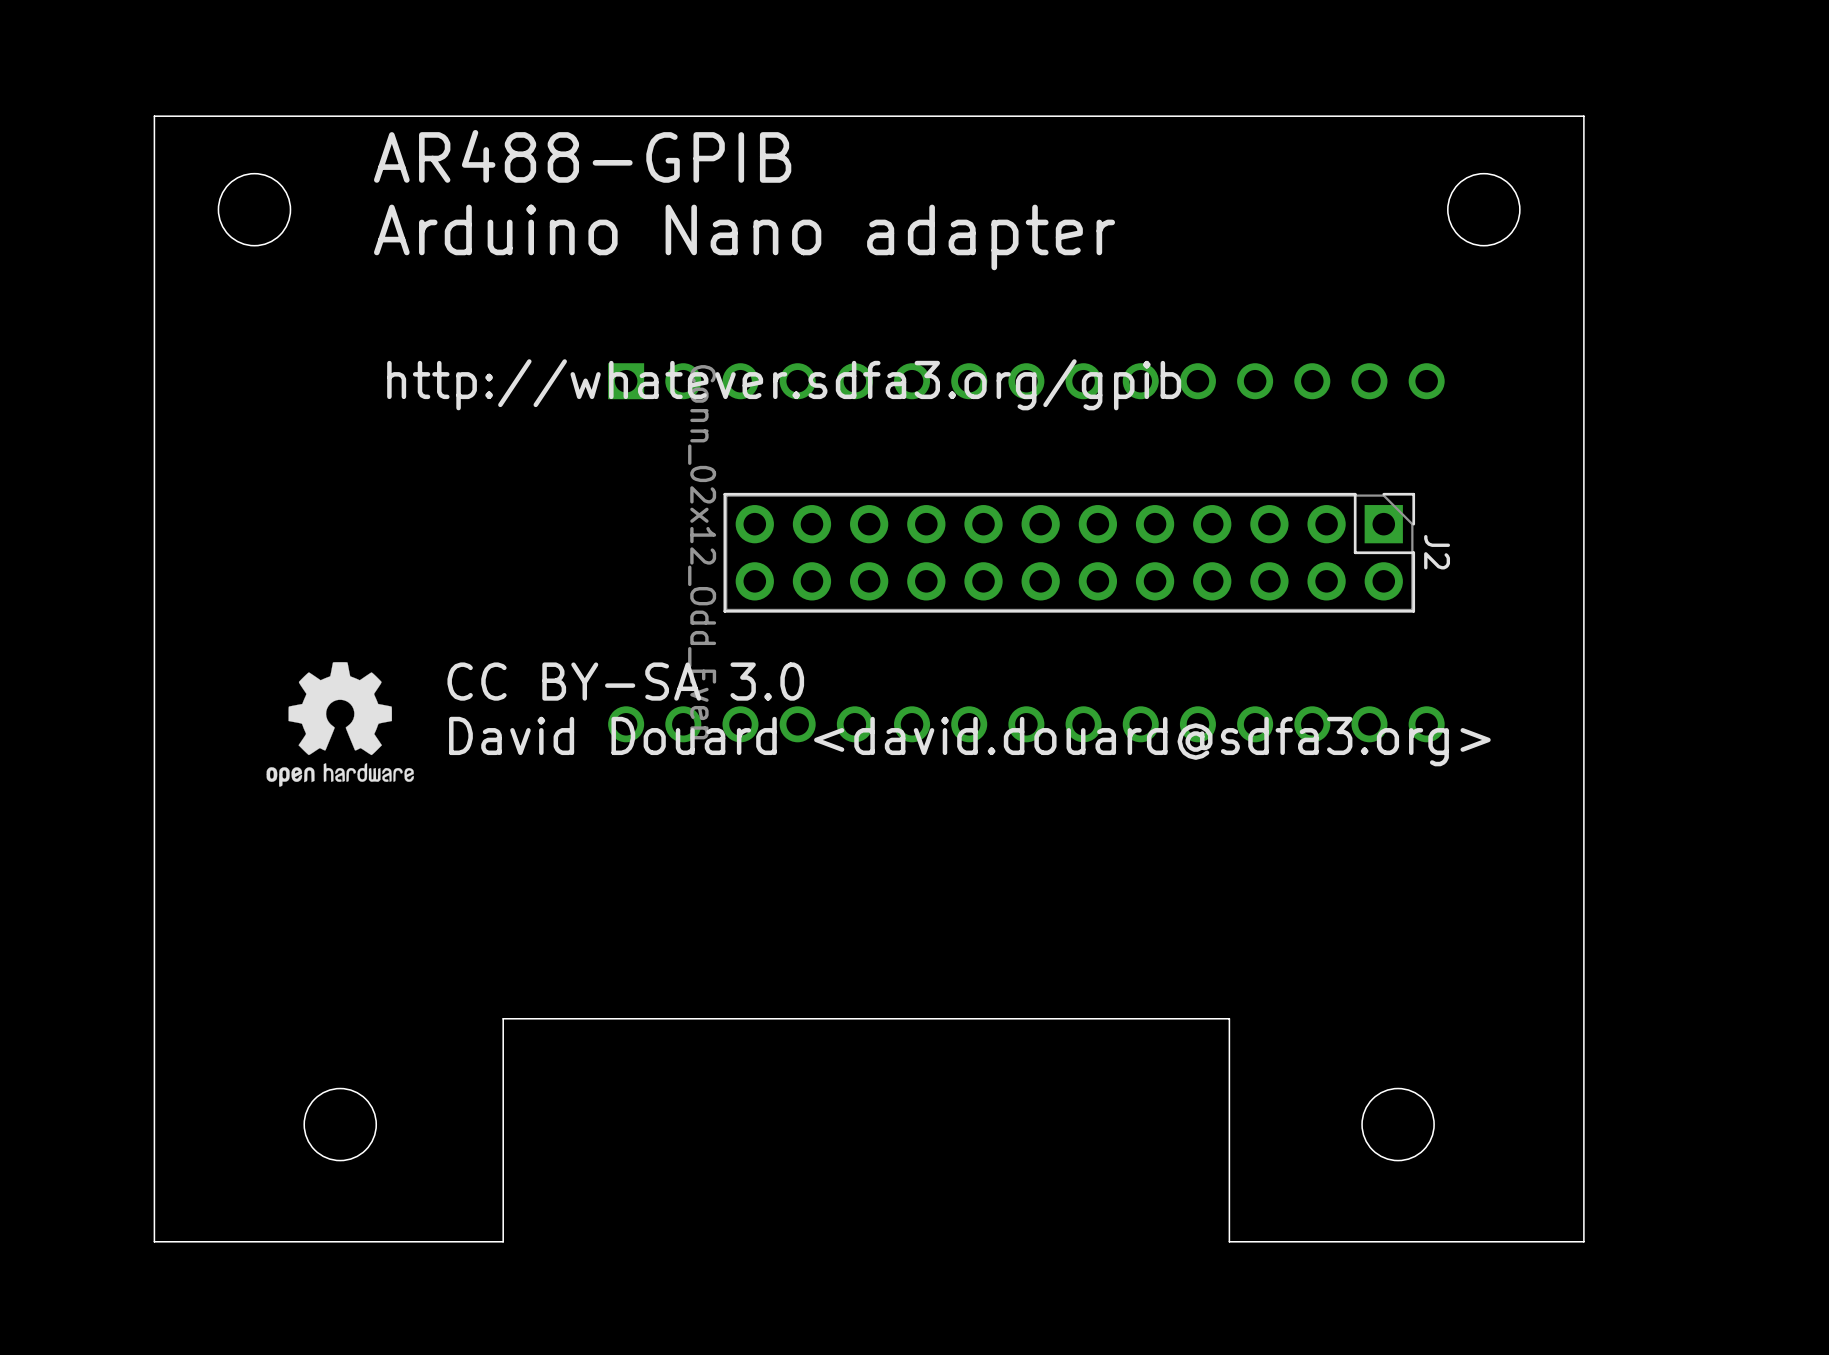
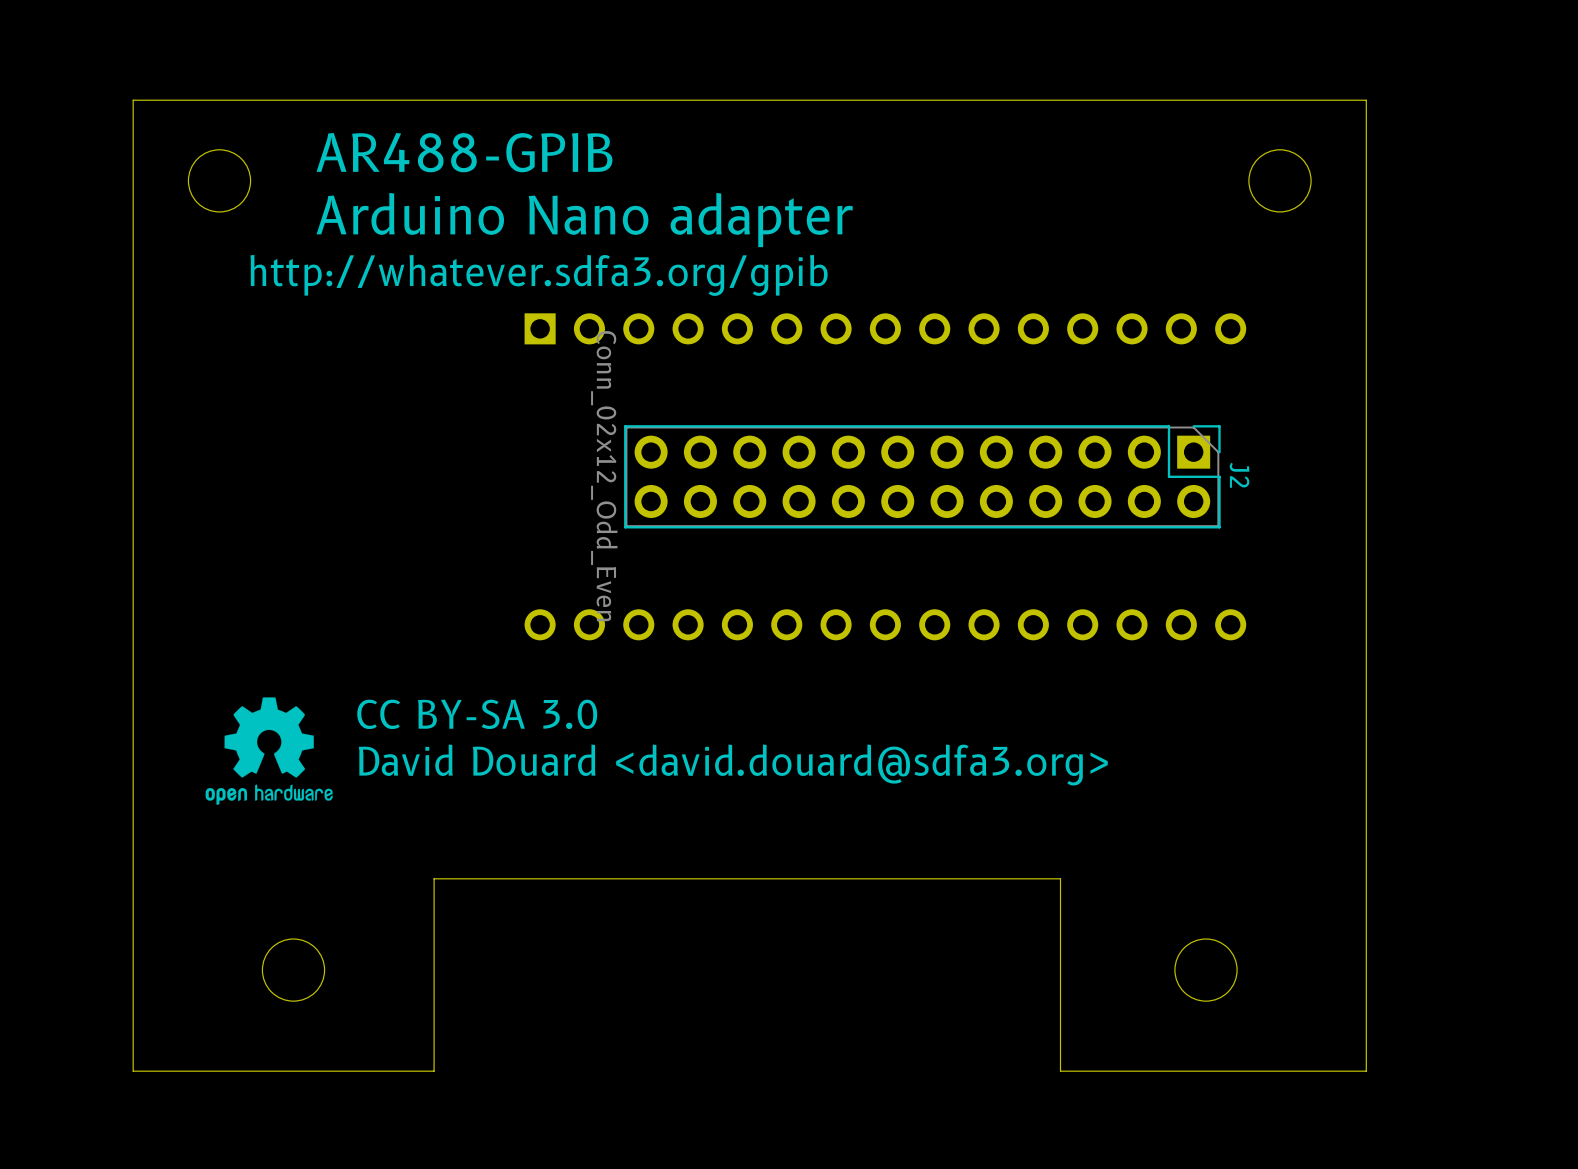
text position: AR488-GPIB (582, 156) -> AR488-GPIB (464, 152)
text position: Arduino Nano adapter (744, 237) -> Arduino Nano adapter (584, 220)
text position: http://whatever.sdfa3.org/gpib (784, 384) -> http://whatever.sdfa3.org/gpib (539, 275)
text position: CC BY-SA 3.0 (625, 681) -> CC BY-SA 3.0 (477, 714)
drawing position: (340, 724) -> (269, 751)
text position: David Douard <david.douard@sdfa3.org> (969, 741) -> David Douard <david.douard@sdfa3.org> (733, 765)

